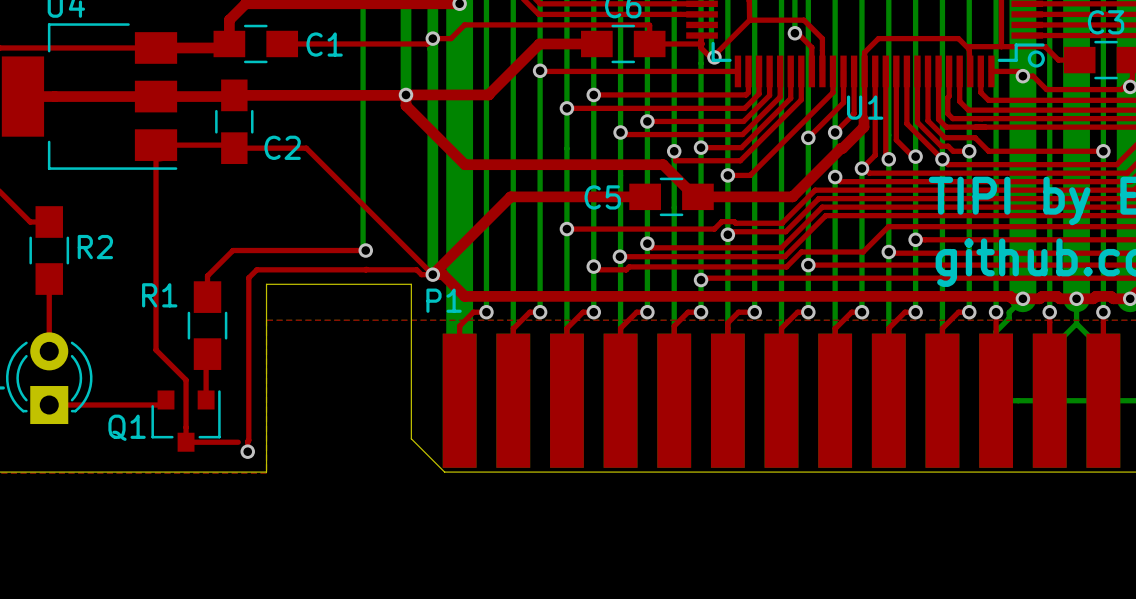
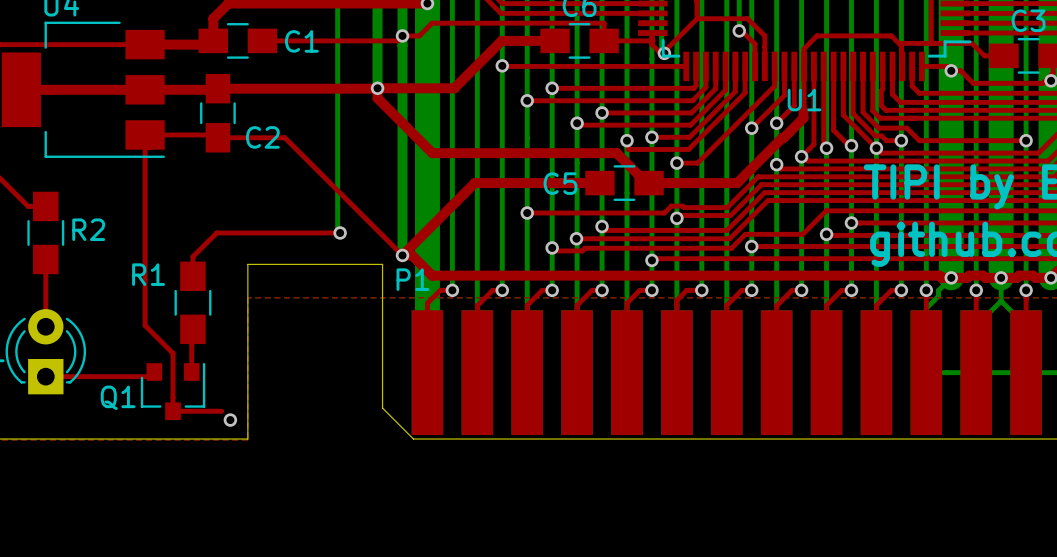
drawing: [1027, 50, 1045, 68] -> none
top track: (432, 274) (421, 274) (416, 269) (256, 269) (248, 277) (247, 451) -> none

